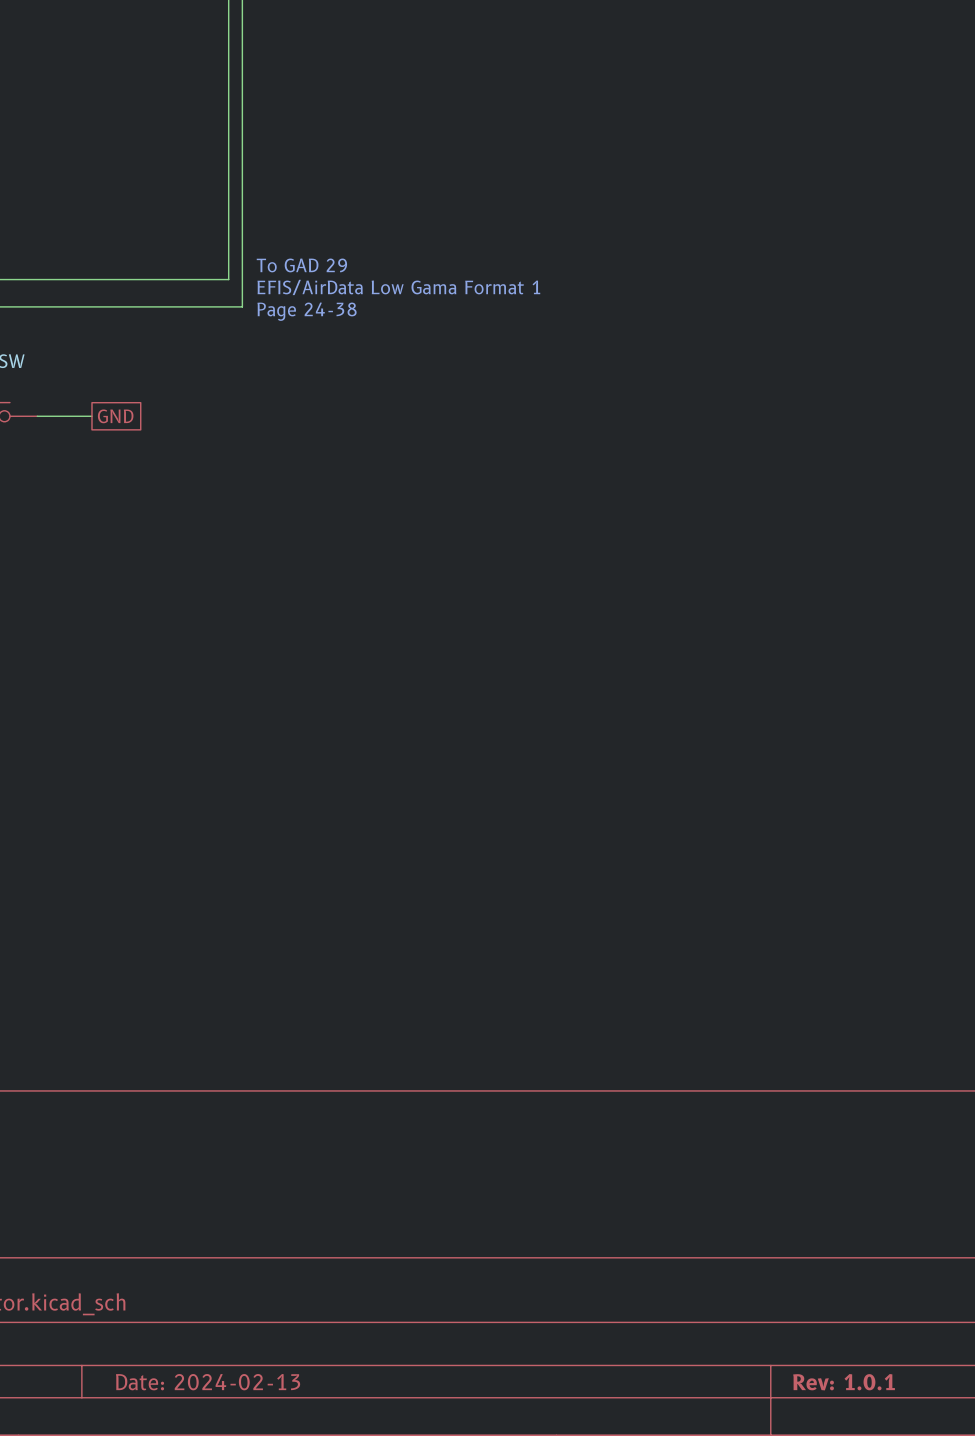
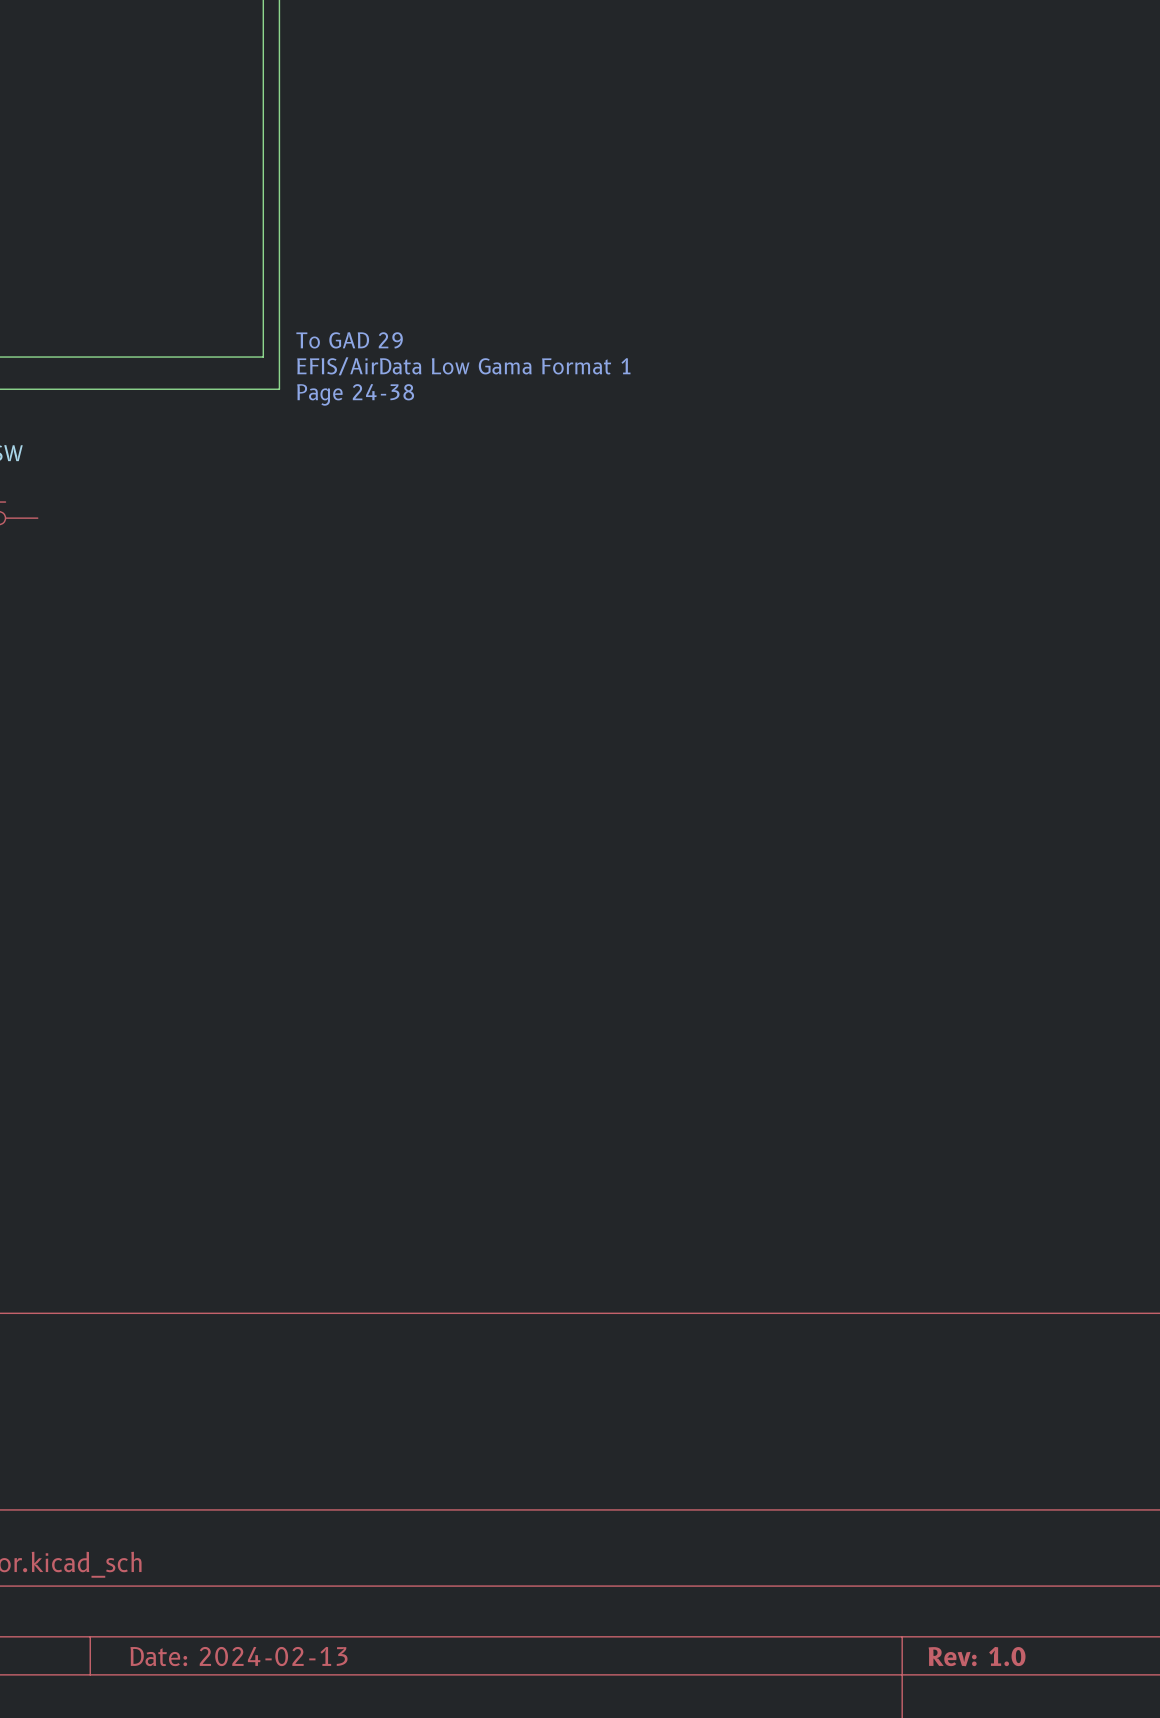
wire: (37, 416) (91, 416) -> none
global label: GND (115, 416) -> none
title block: Rev: 1.0.1 (844, 1382) -> Rev: 1.0 (977, 1656)

